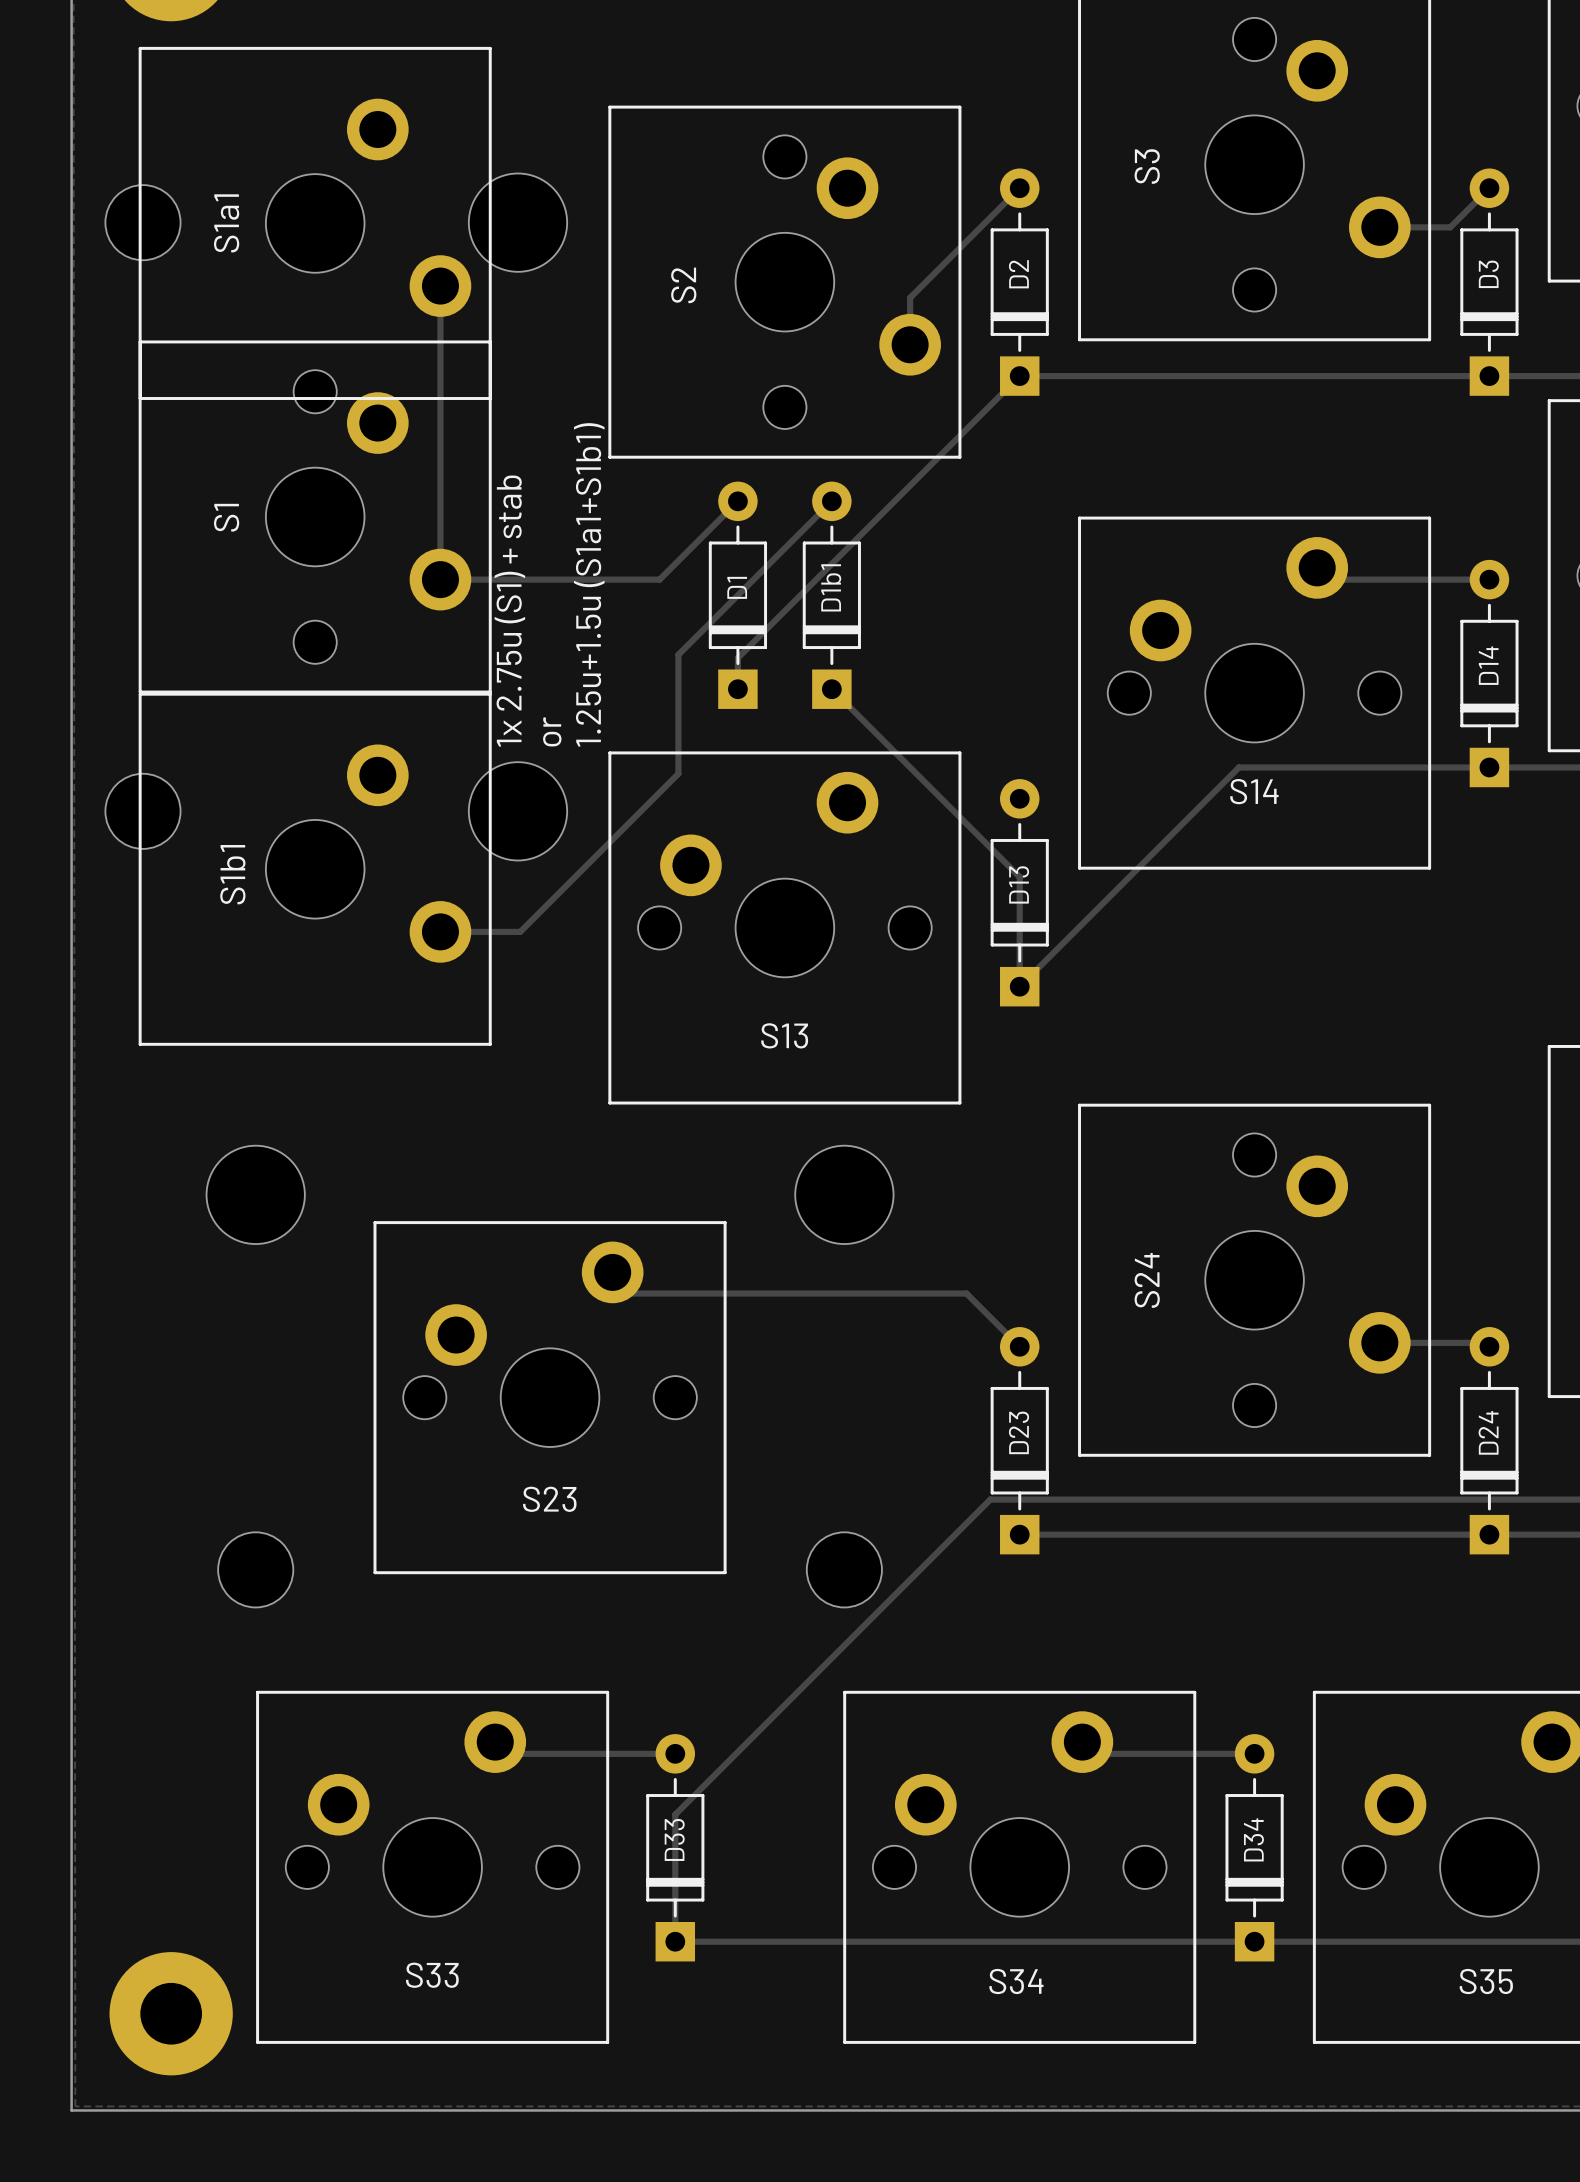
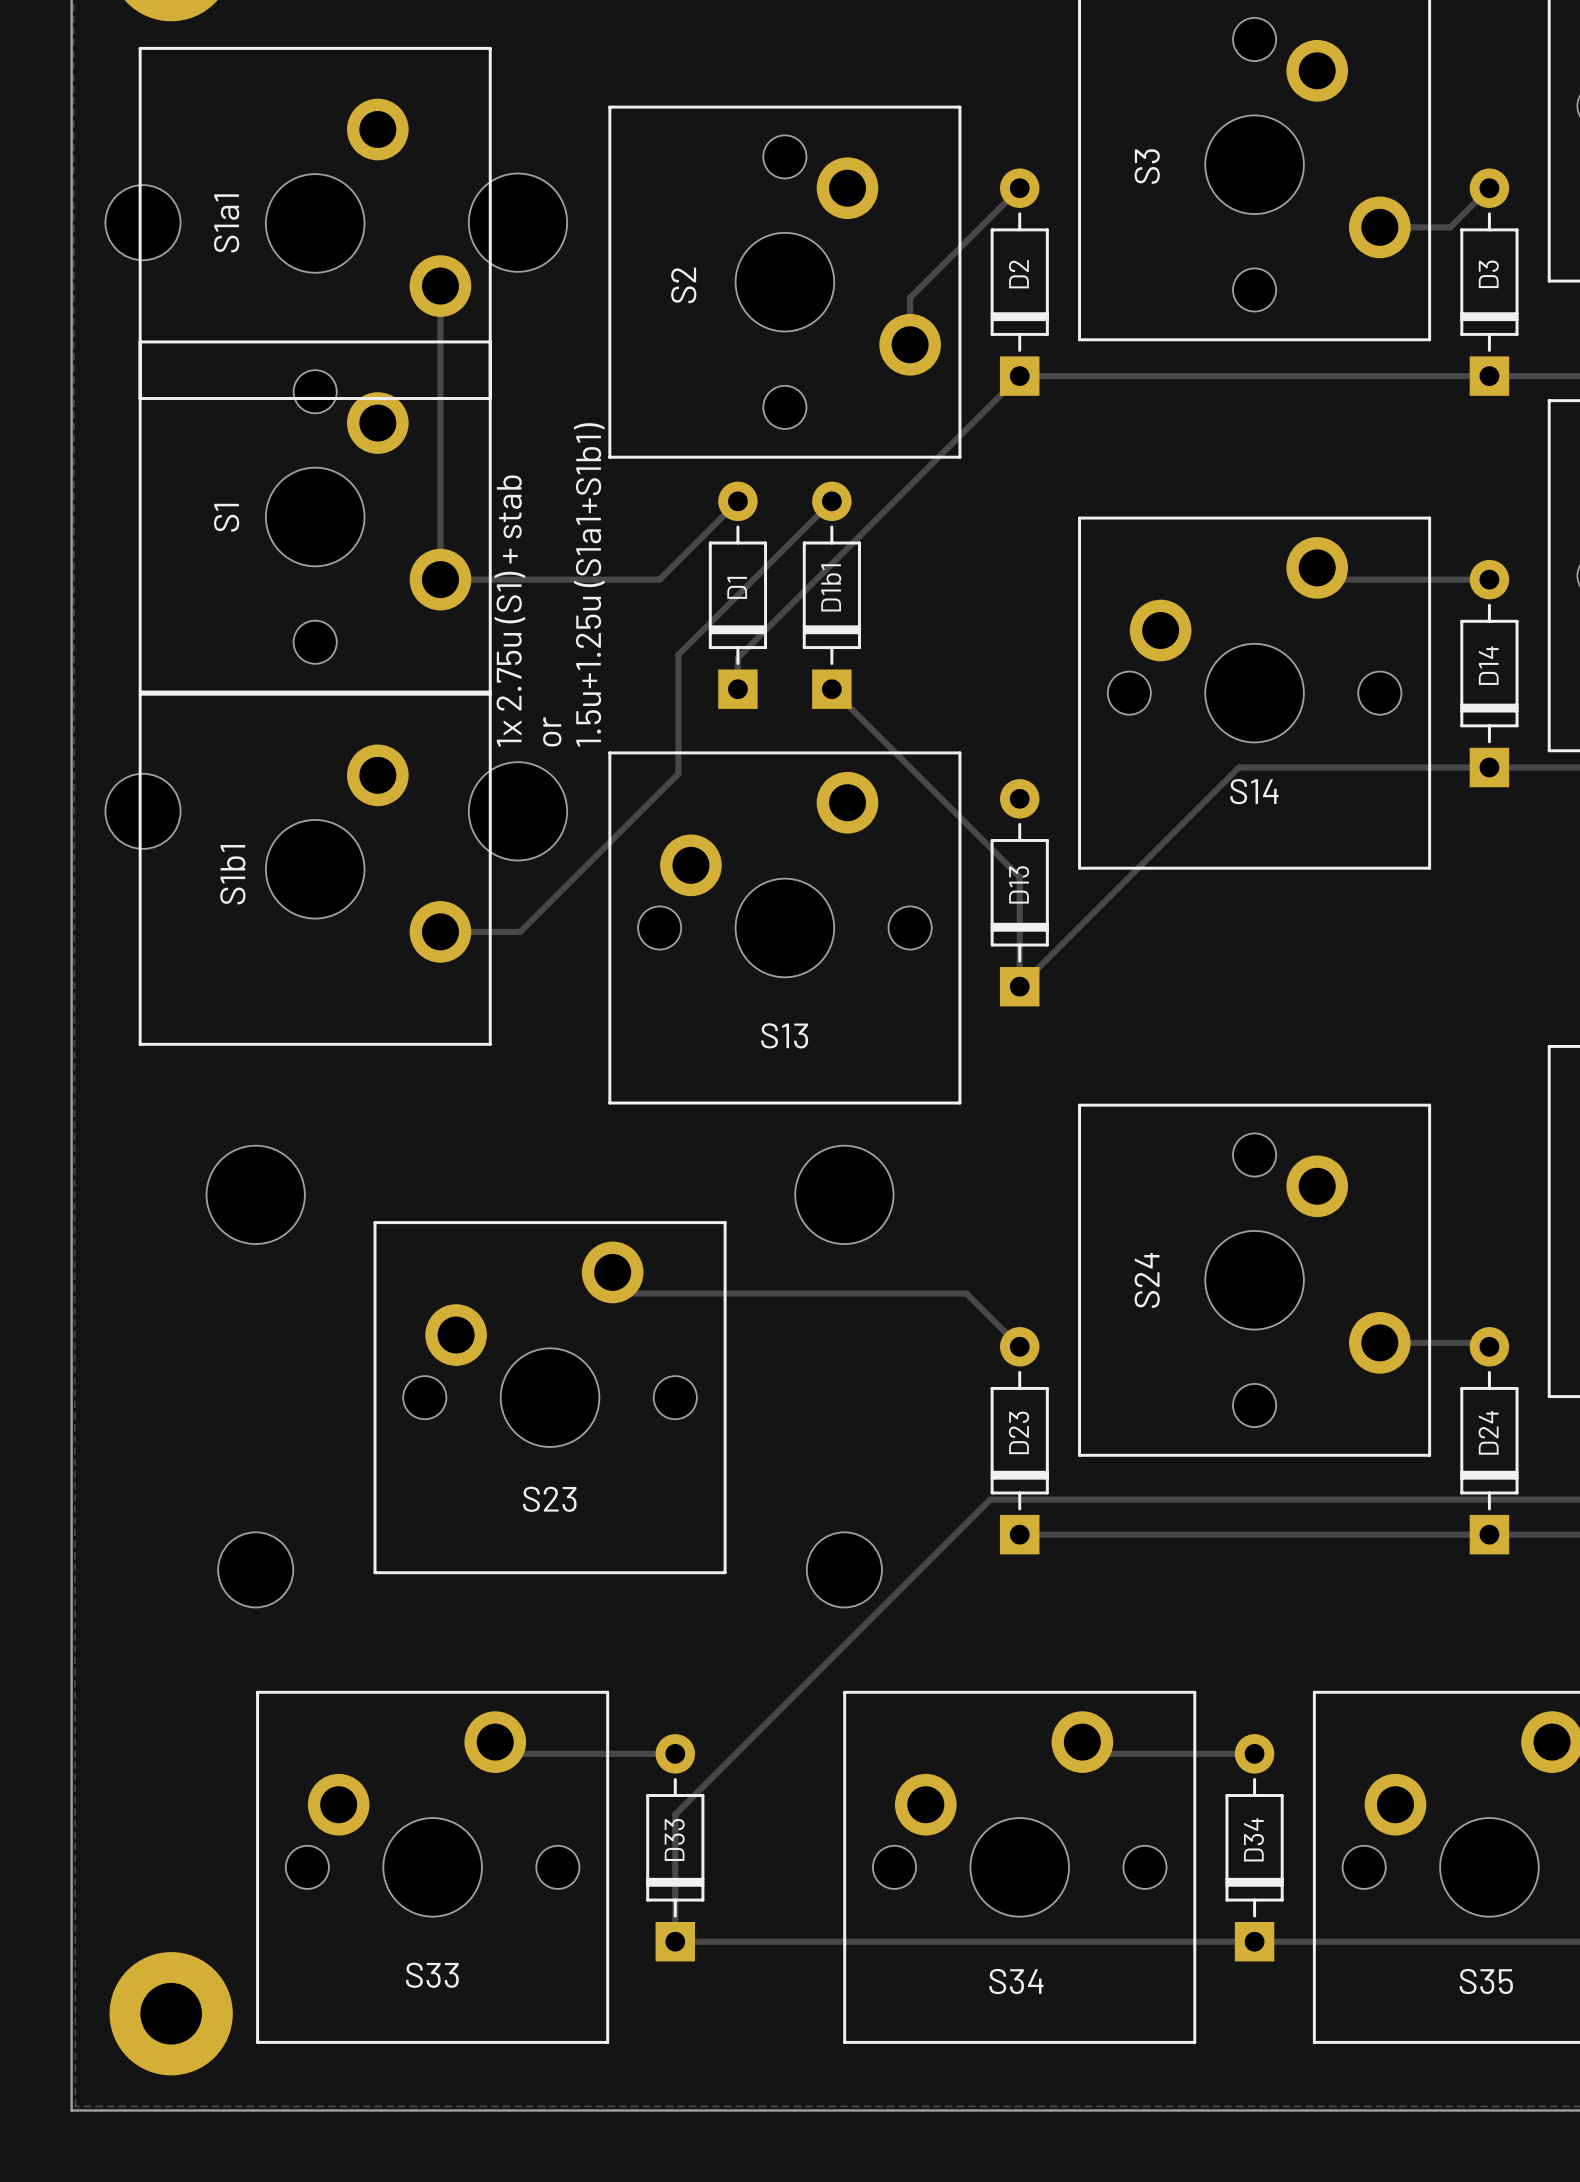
text: 1.25u+1.5u (S1a1+S1b1) (589, 584) -> 1.5u+1.25u (S1a1+S1b1) (589, 584)

